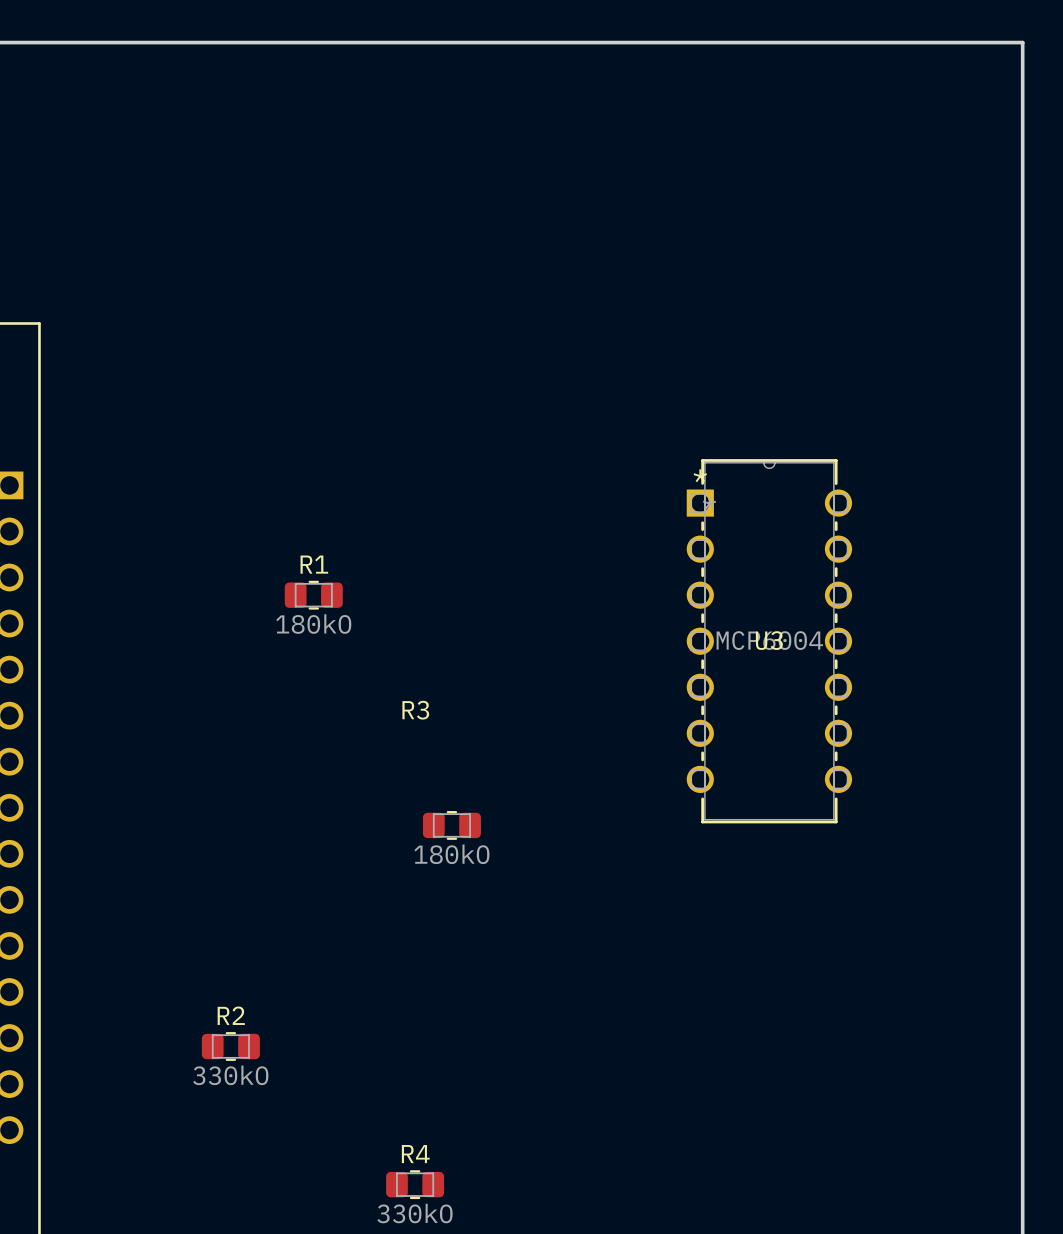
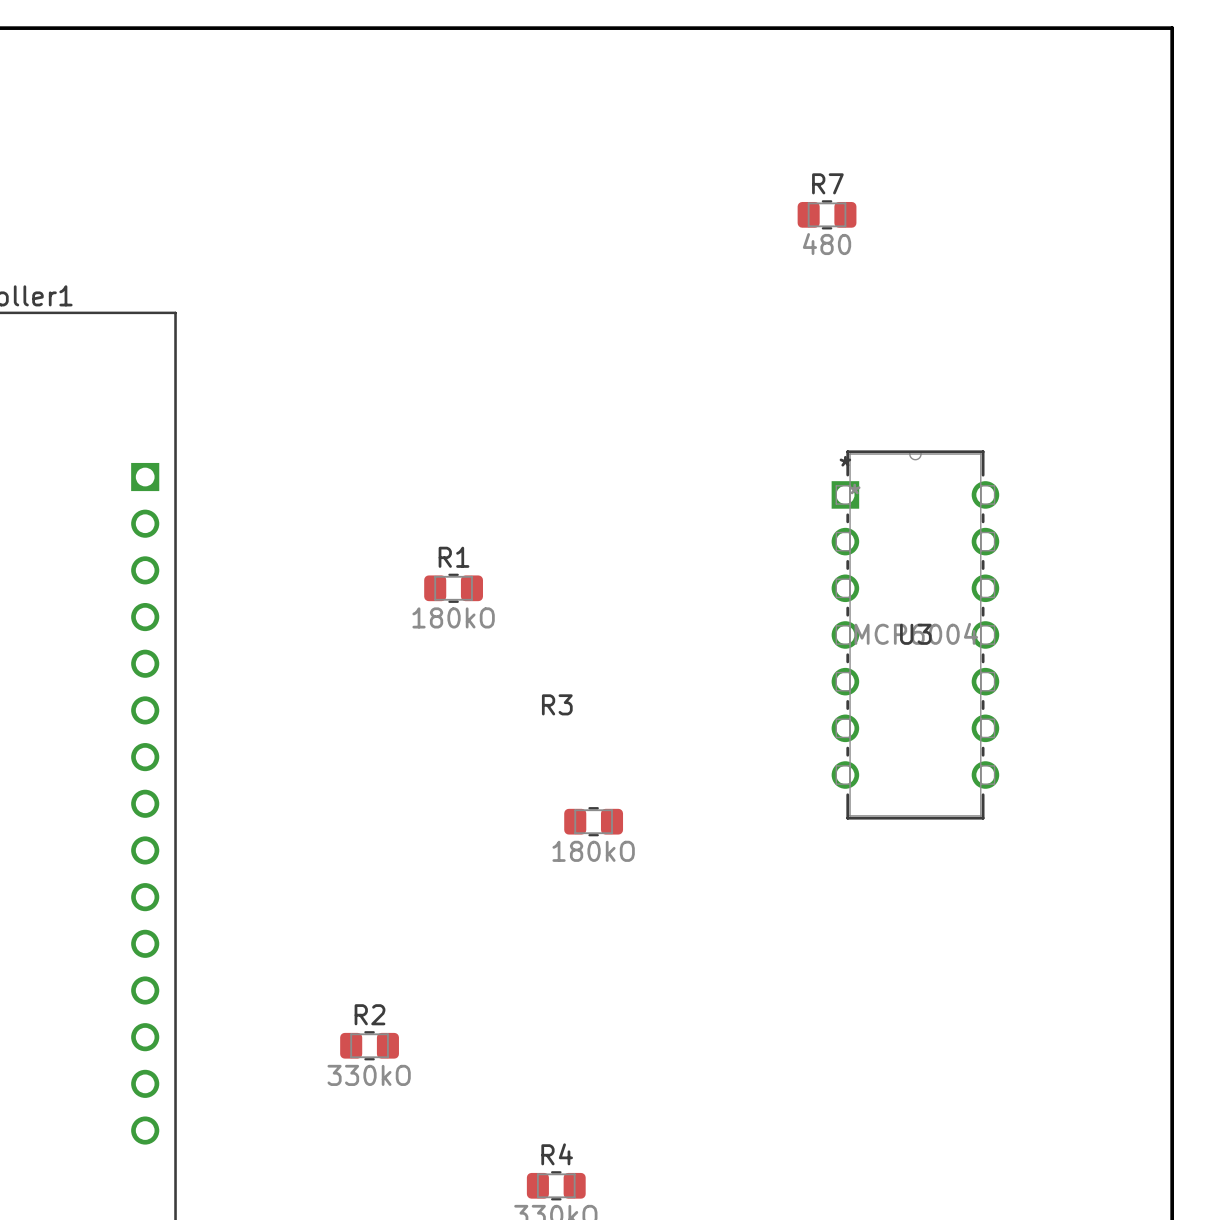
R7: none -> 480 (827, 214)

